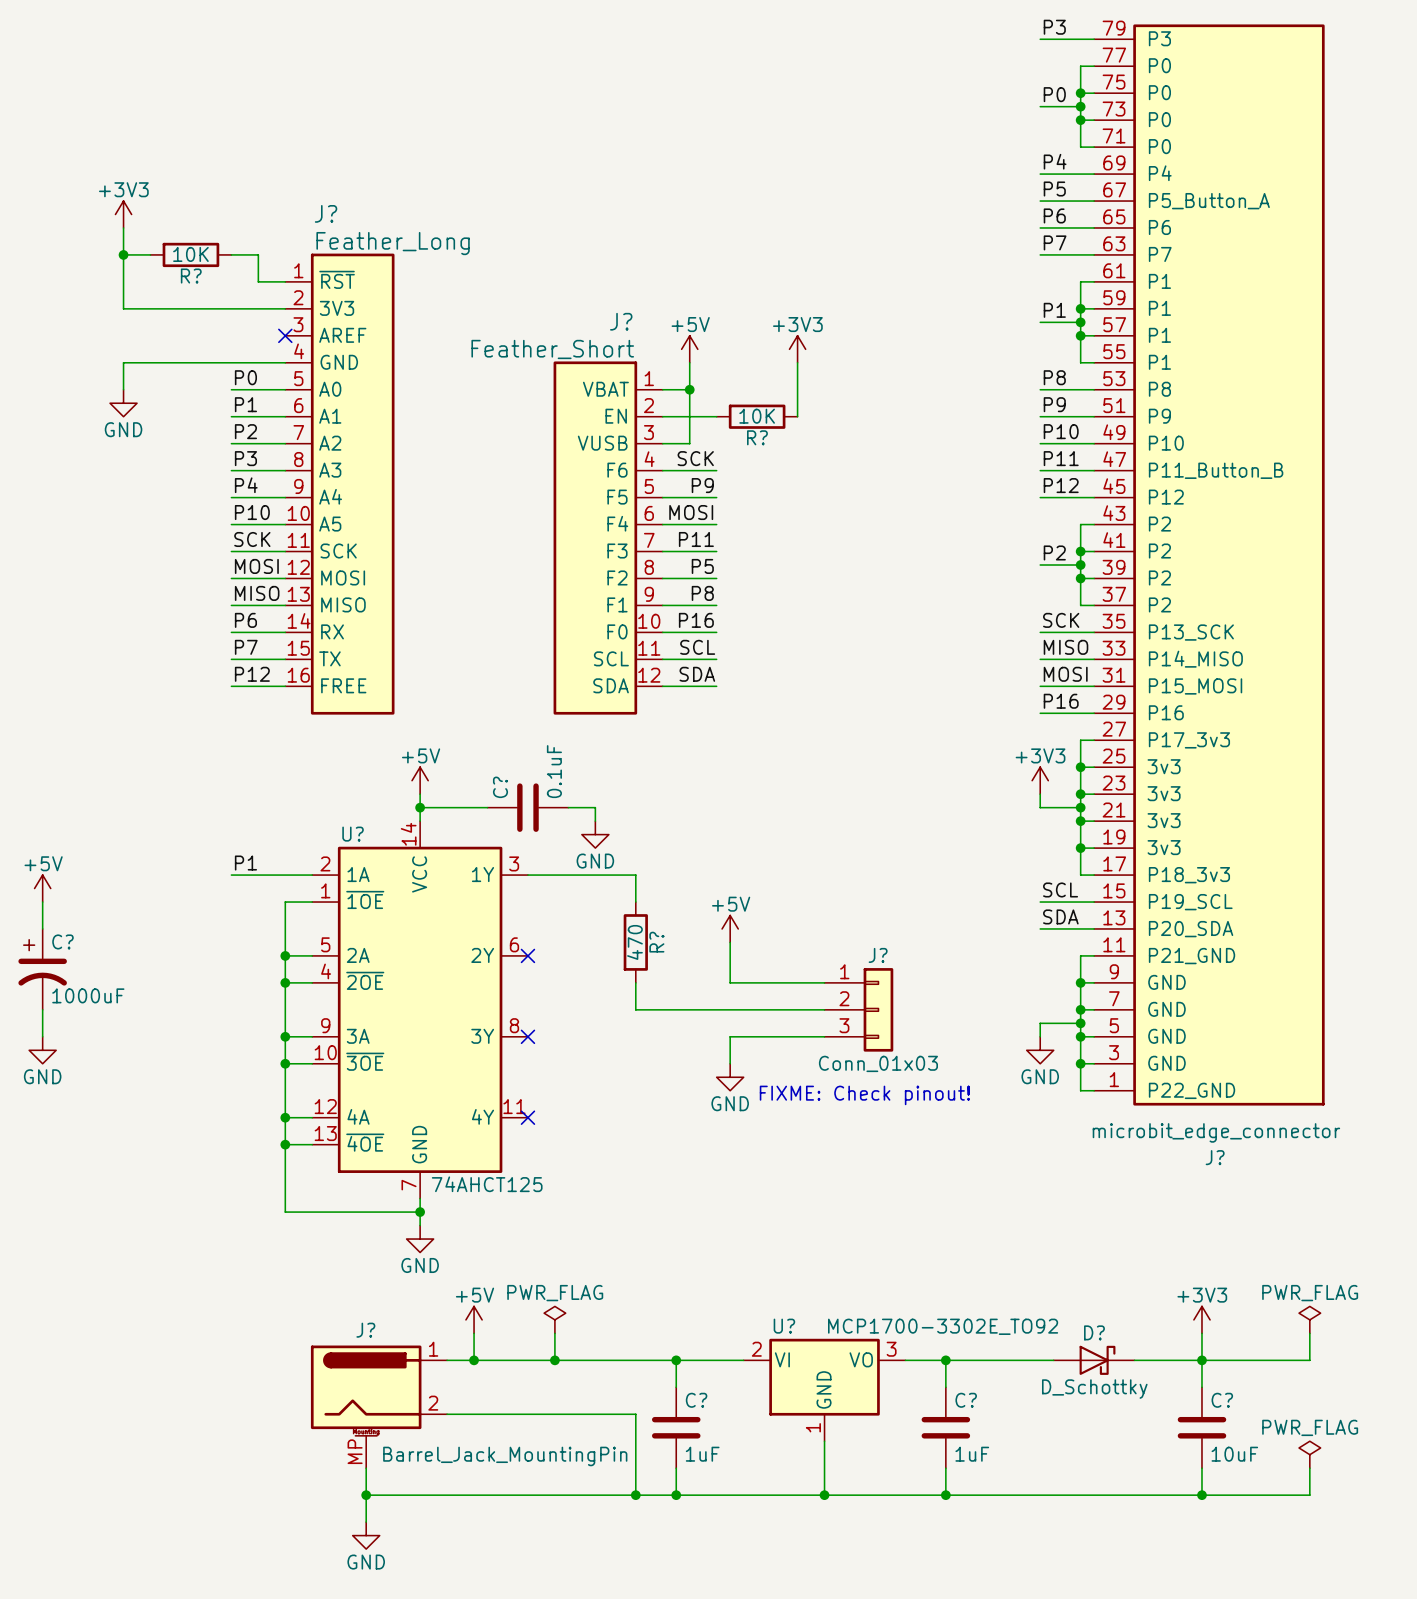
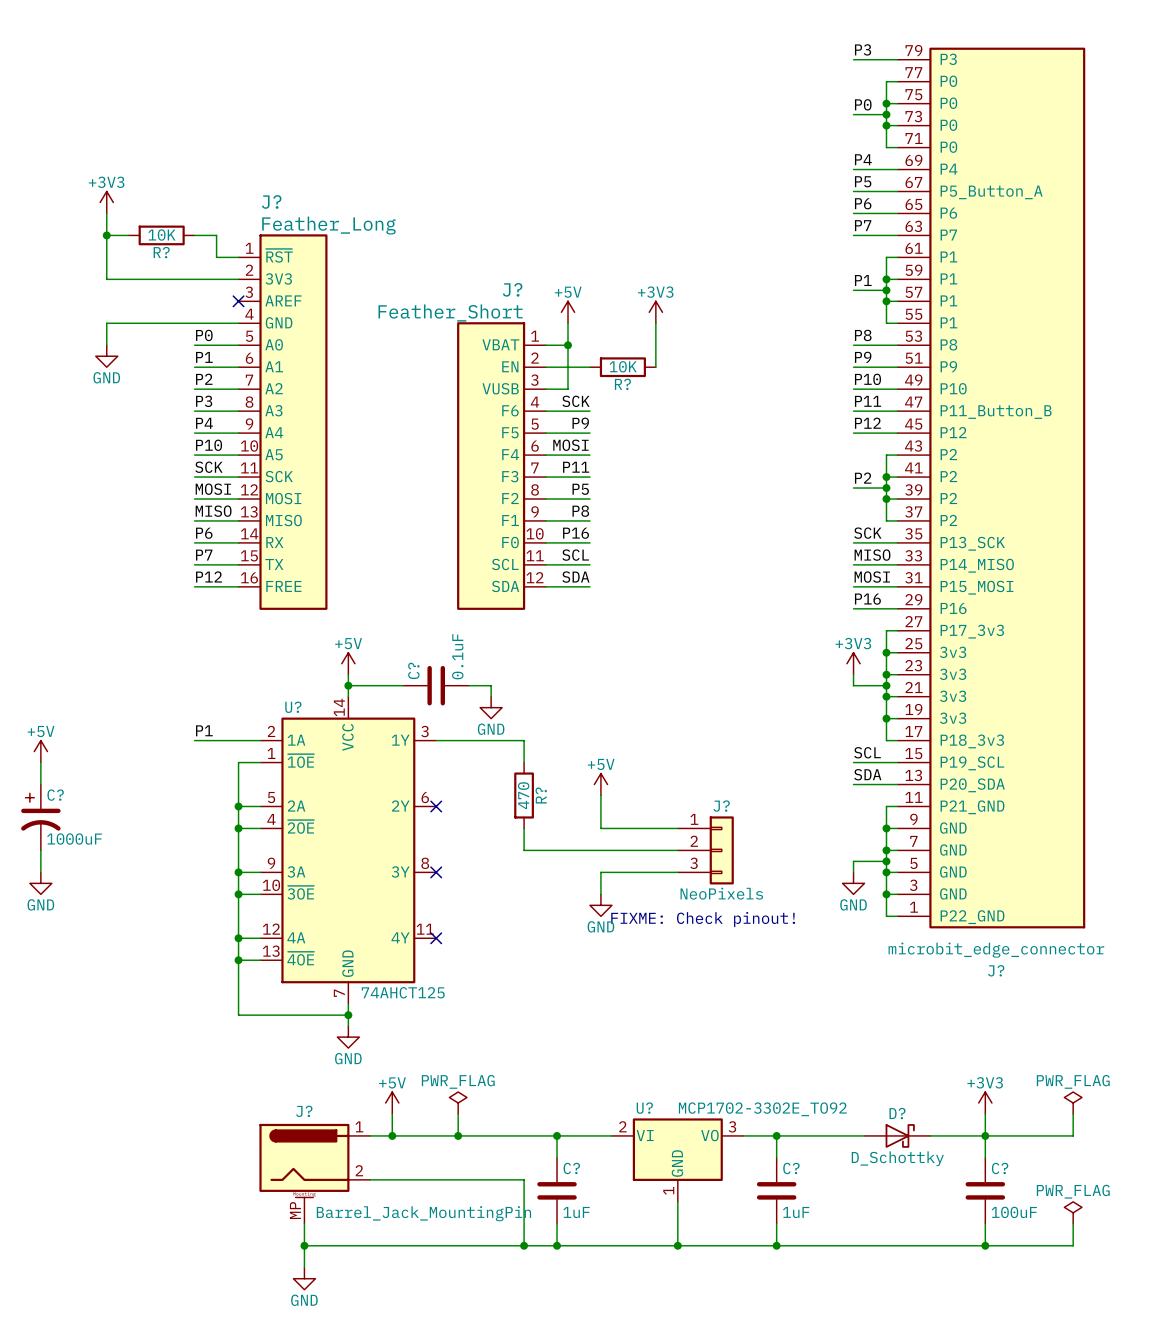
J? value: Conn_01x03 (878, 1063) -> NeoPixels (721, 893)
U? value: MCP1700-3302E_TO92 (943, 1326) -> MCP1702-3302E_TO92 (762, 1109)
C? value: 10uF (1234, 1454) -> 100uF (1014, 1212)

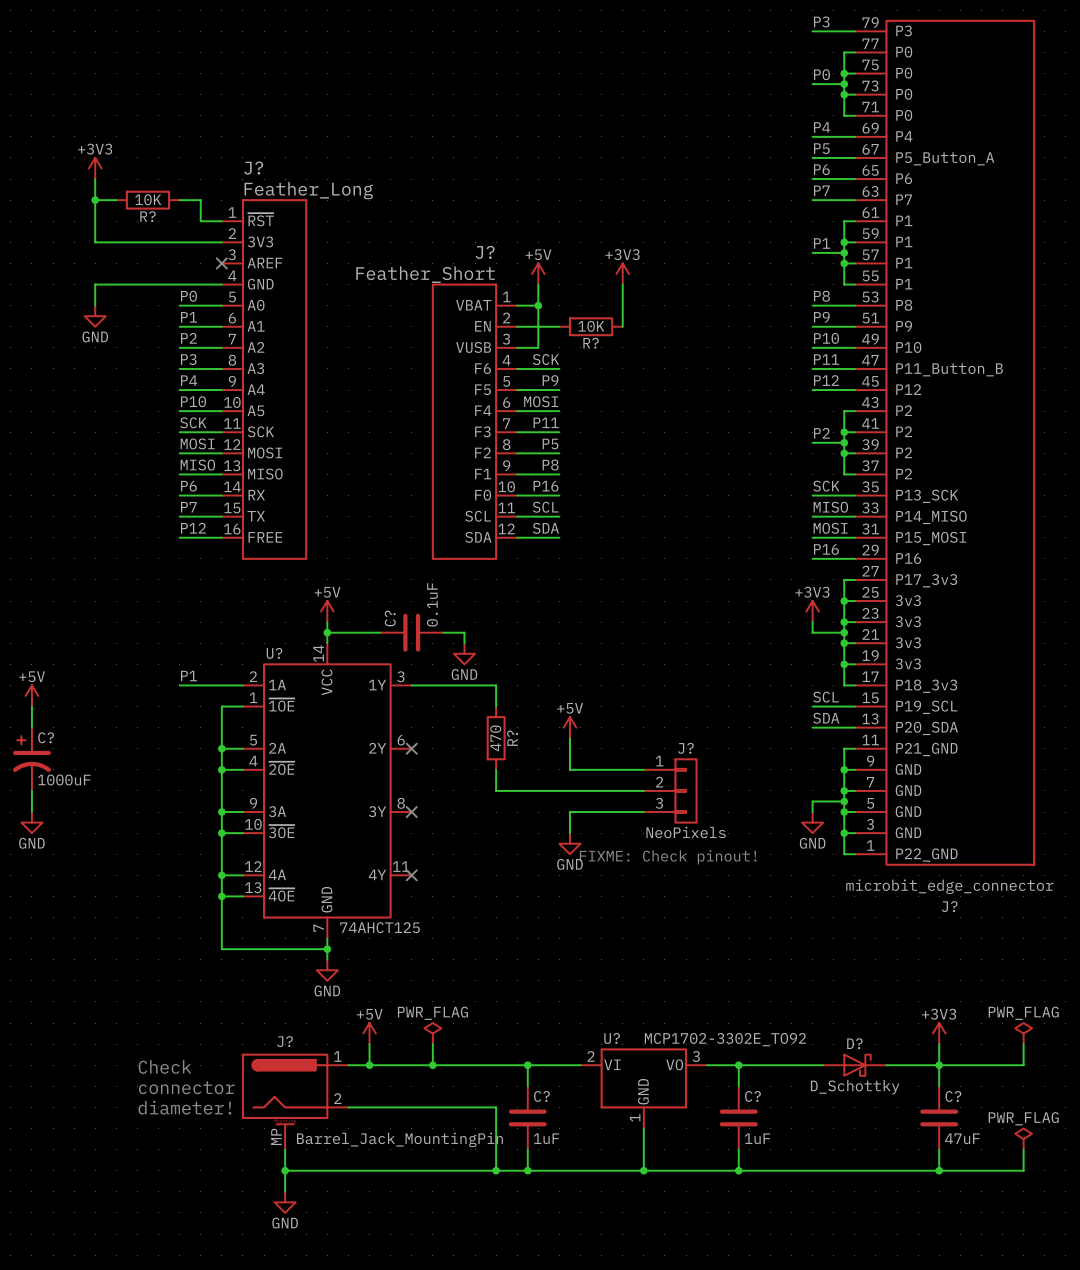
text: none -> Check (165, 1066)
text: none -> connector (186, 1087)
text: none -> diameter! (184, 1107)
C? value: 100uF (1014, 1212) -> 47uF (962, 1138)

